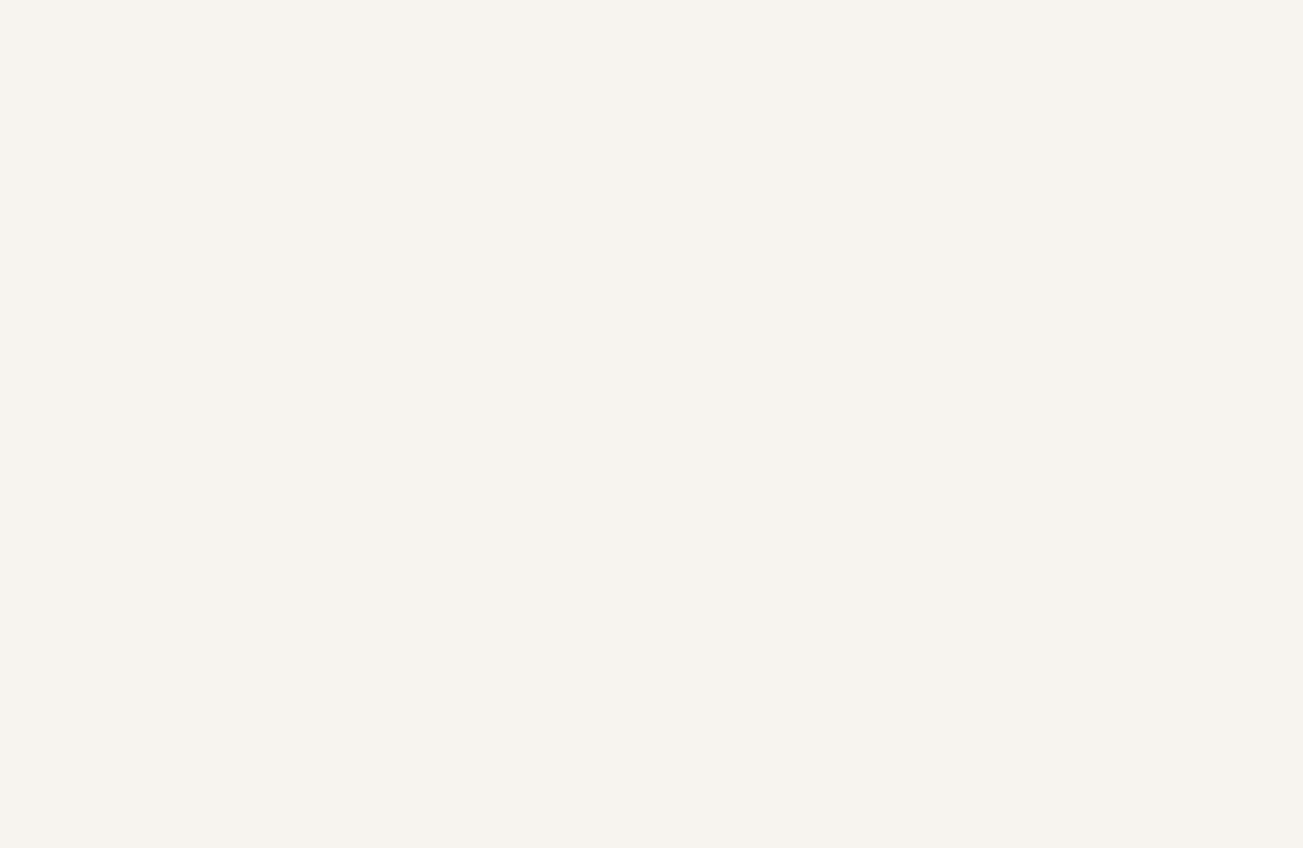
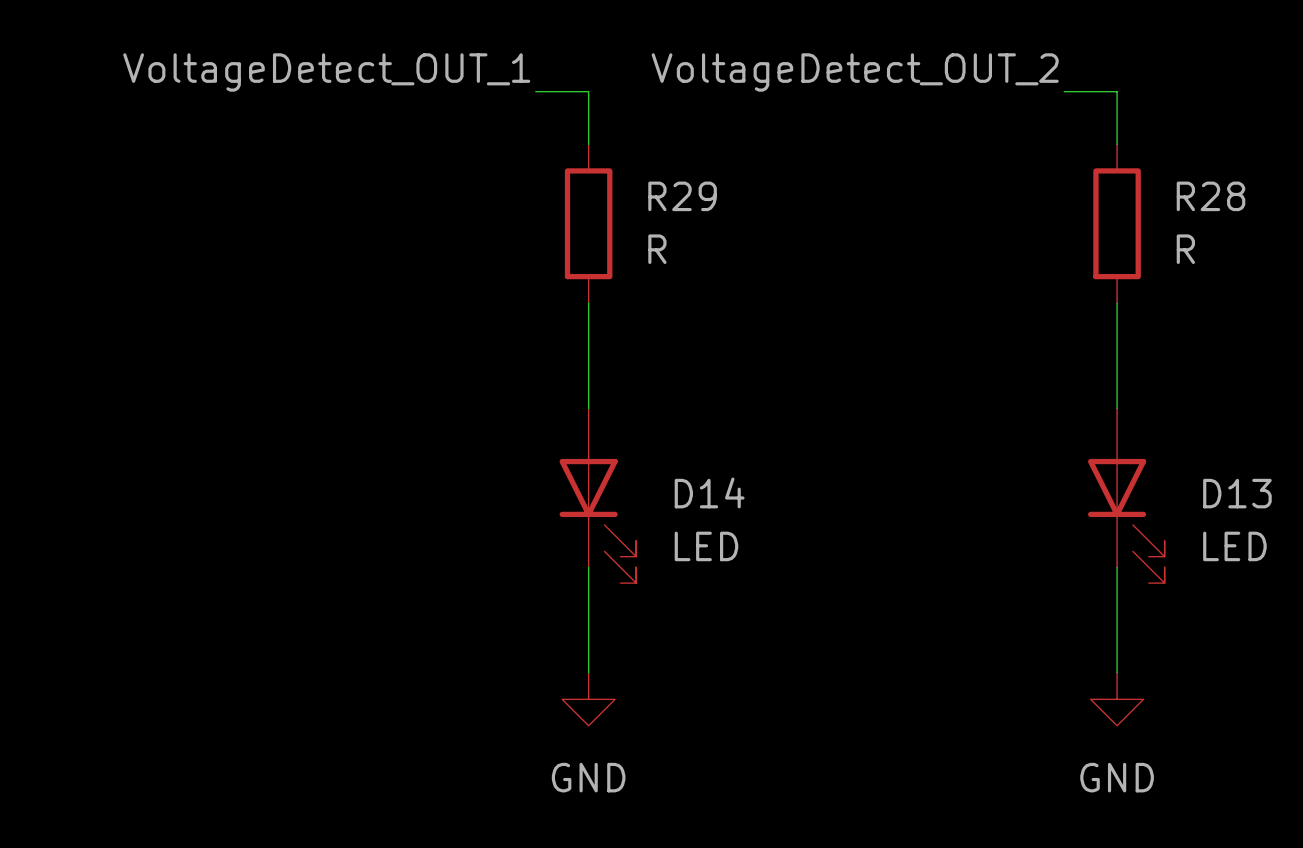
label: none -> VoltageDetect_OUT_1 (326, 72)
label: none -> VoltageDetect_OUT_2 (855, 72)
wire: none -> (535, 91) (588, 91) (588, 144)
wire: none -> (1064, 91) (1117, 91) (1117, 144)
R29: none -> R (588, 223)
R28: none -> R (1117, 223)
wire: none -> (588, 303) (588, 408)
wire: none -> (1117, 303) (1117, 408)
D14: none -> LED (597, 495)
D13: none -> LED (1126, 495)
wire: none -> (588, 567) (588, 672)
wire: none -> (1117, 567) (1117, 672)
power symbol: none -> GND (588, 699)
power symbol: none -> GND (1117, 699)

